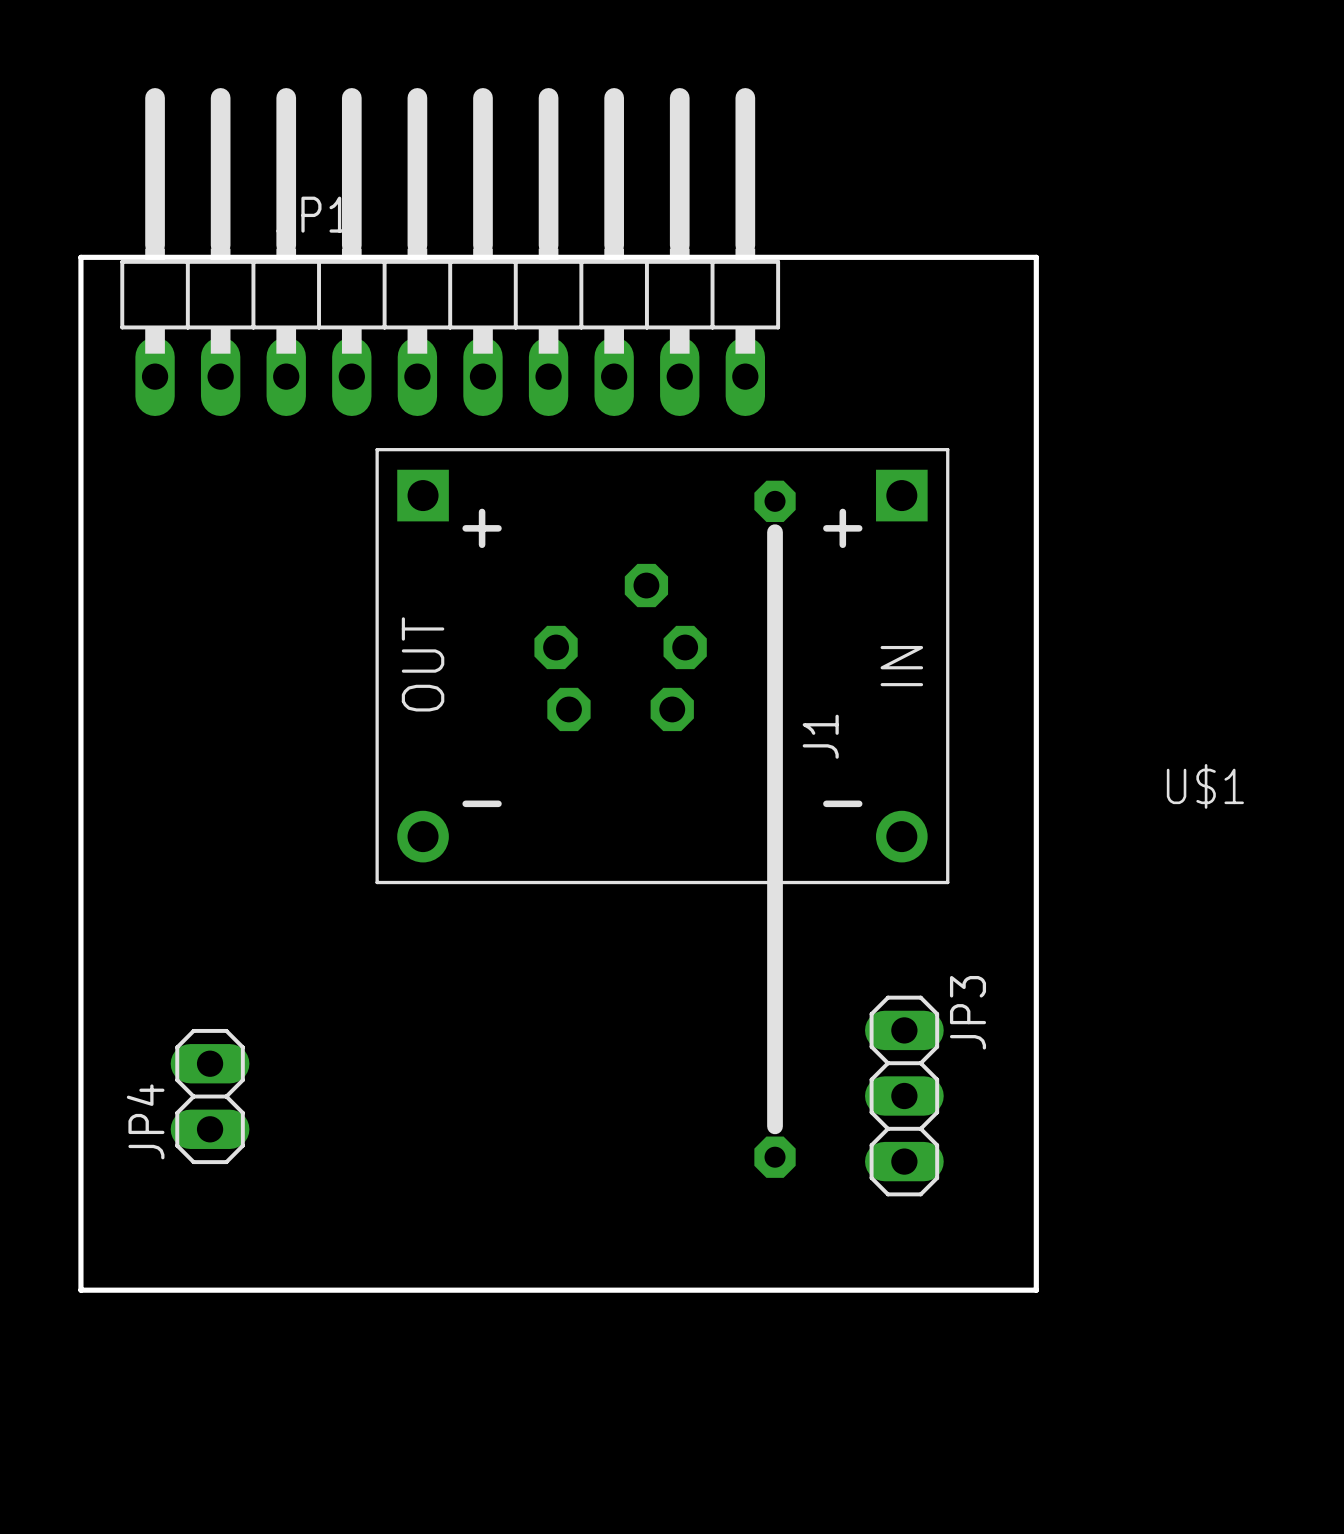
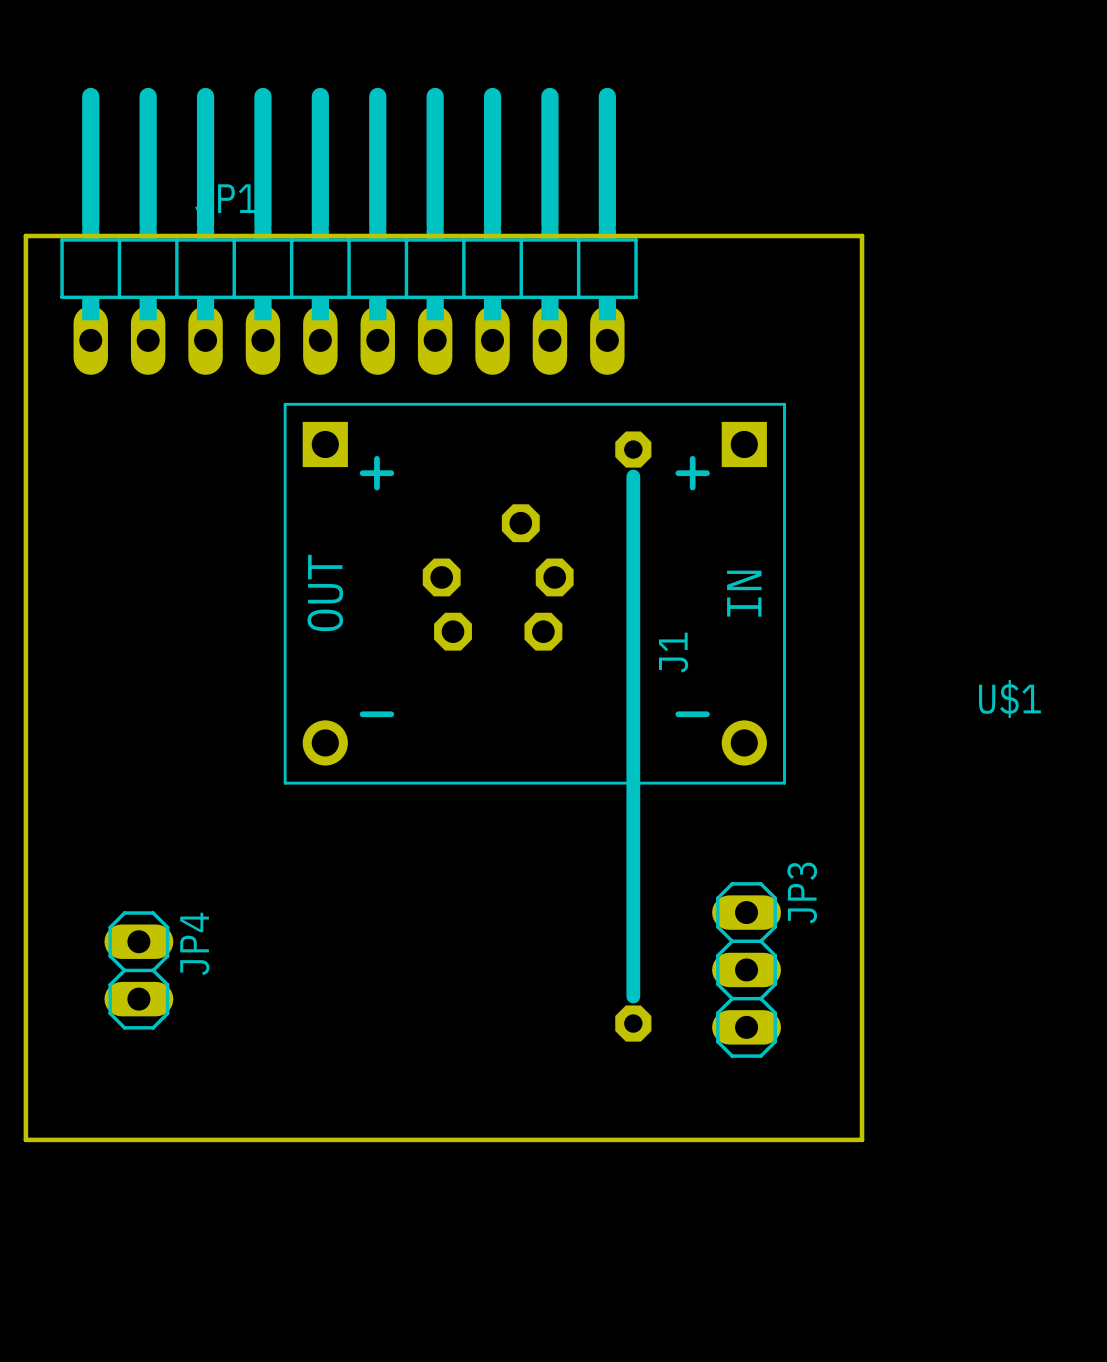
JP4 name position: JP4 (145, 1121) -> JP4 (194, 943)

